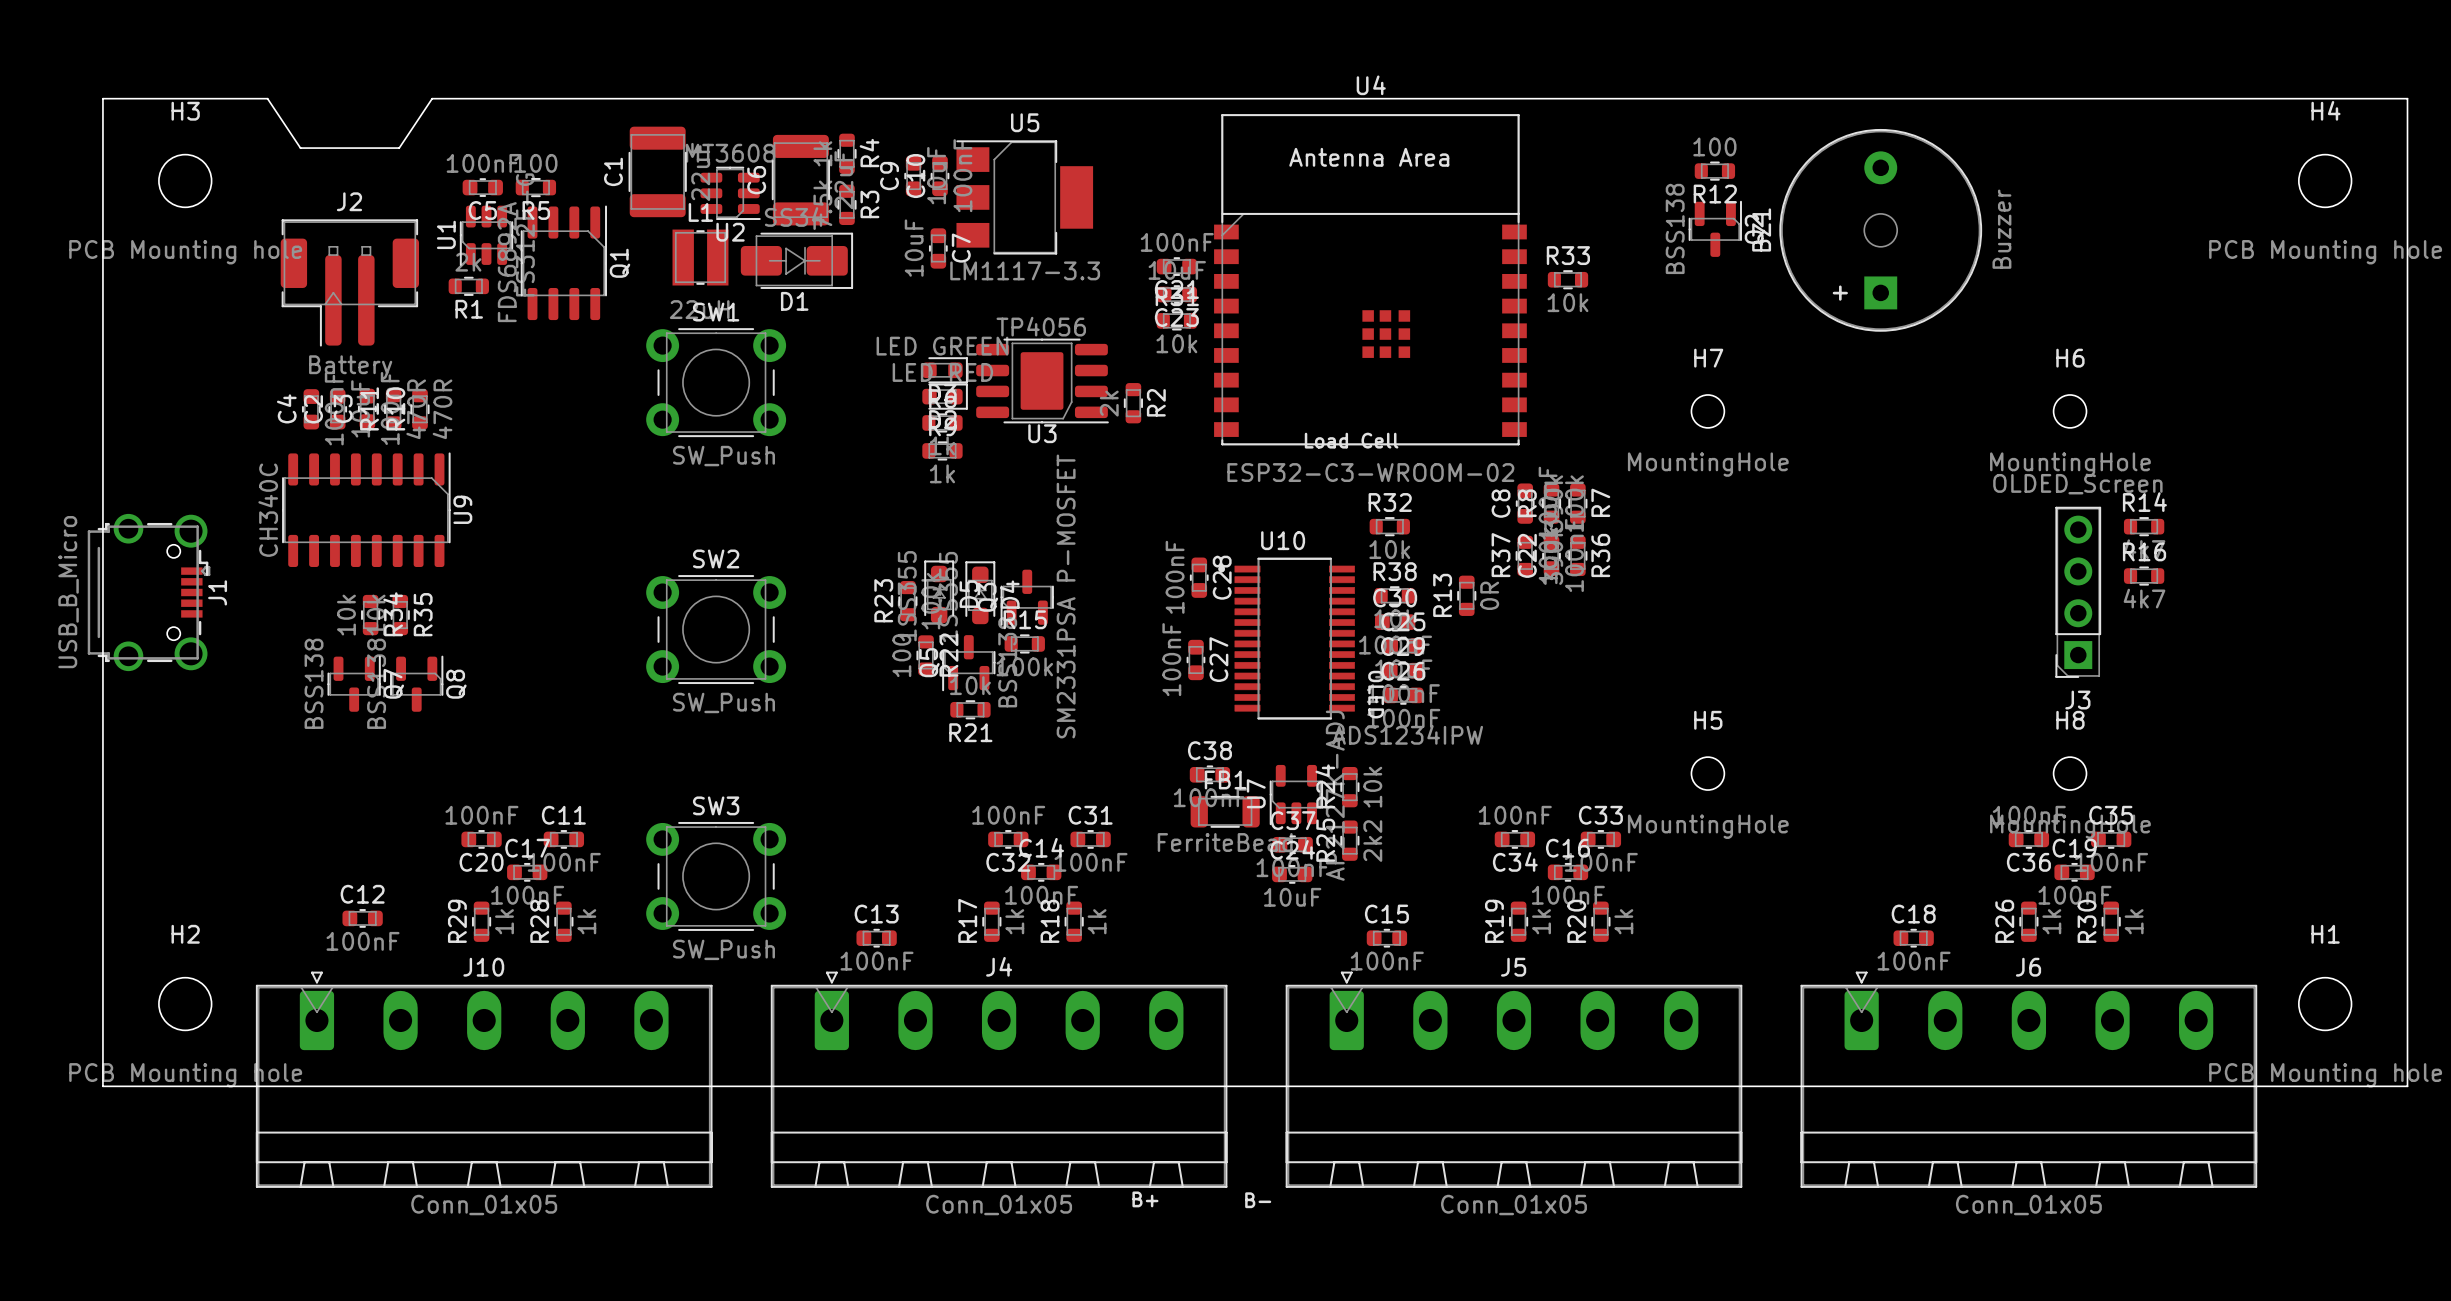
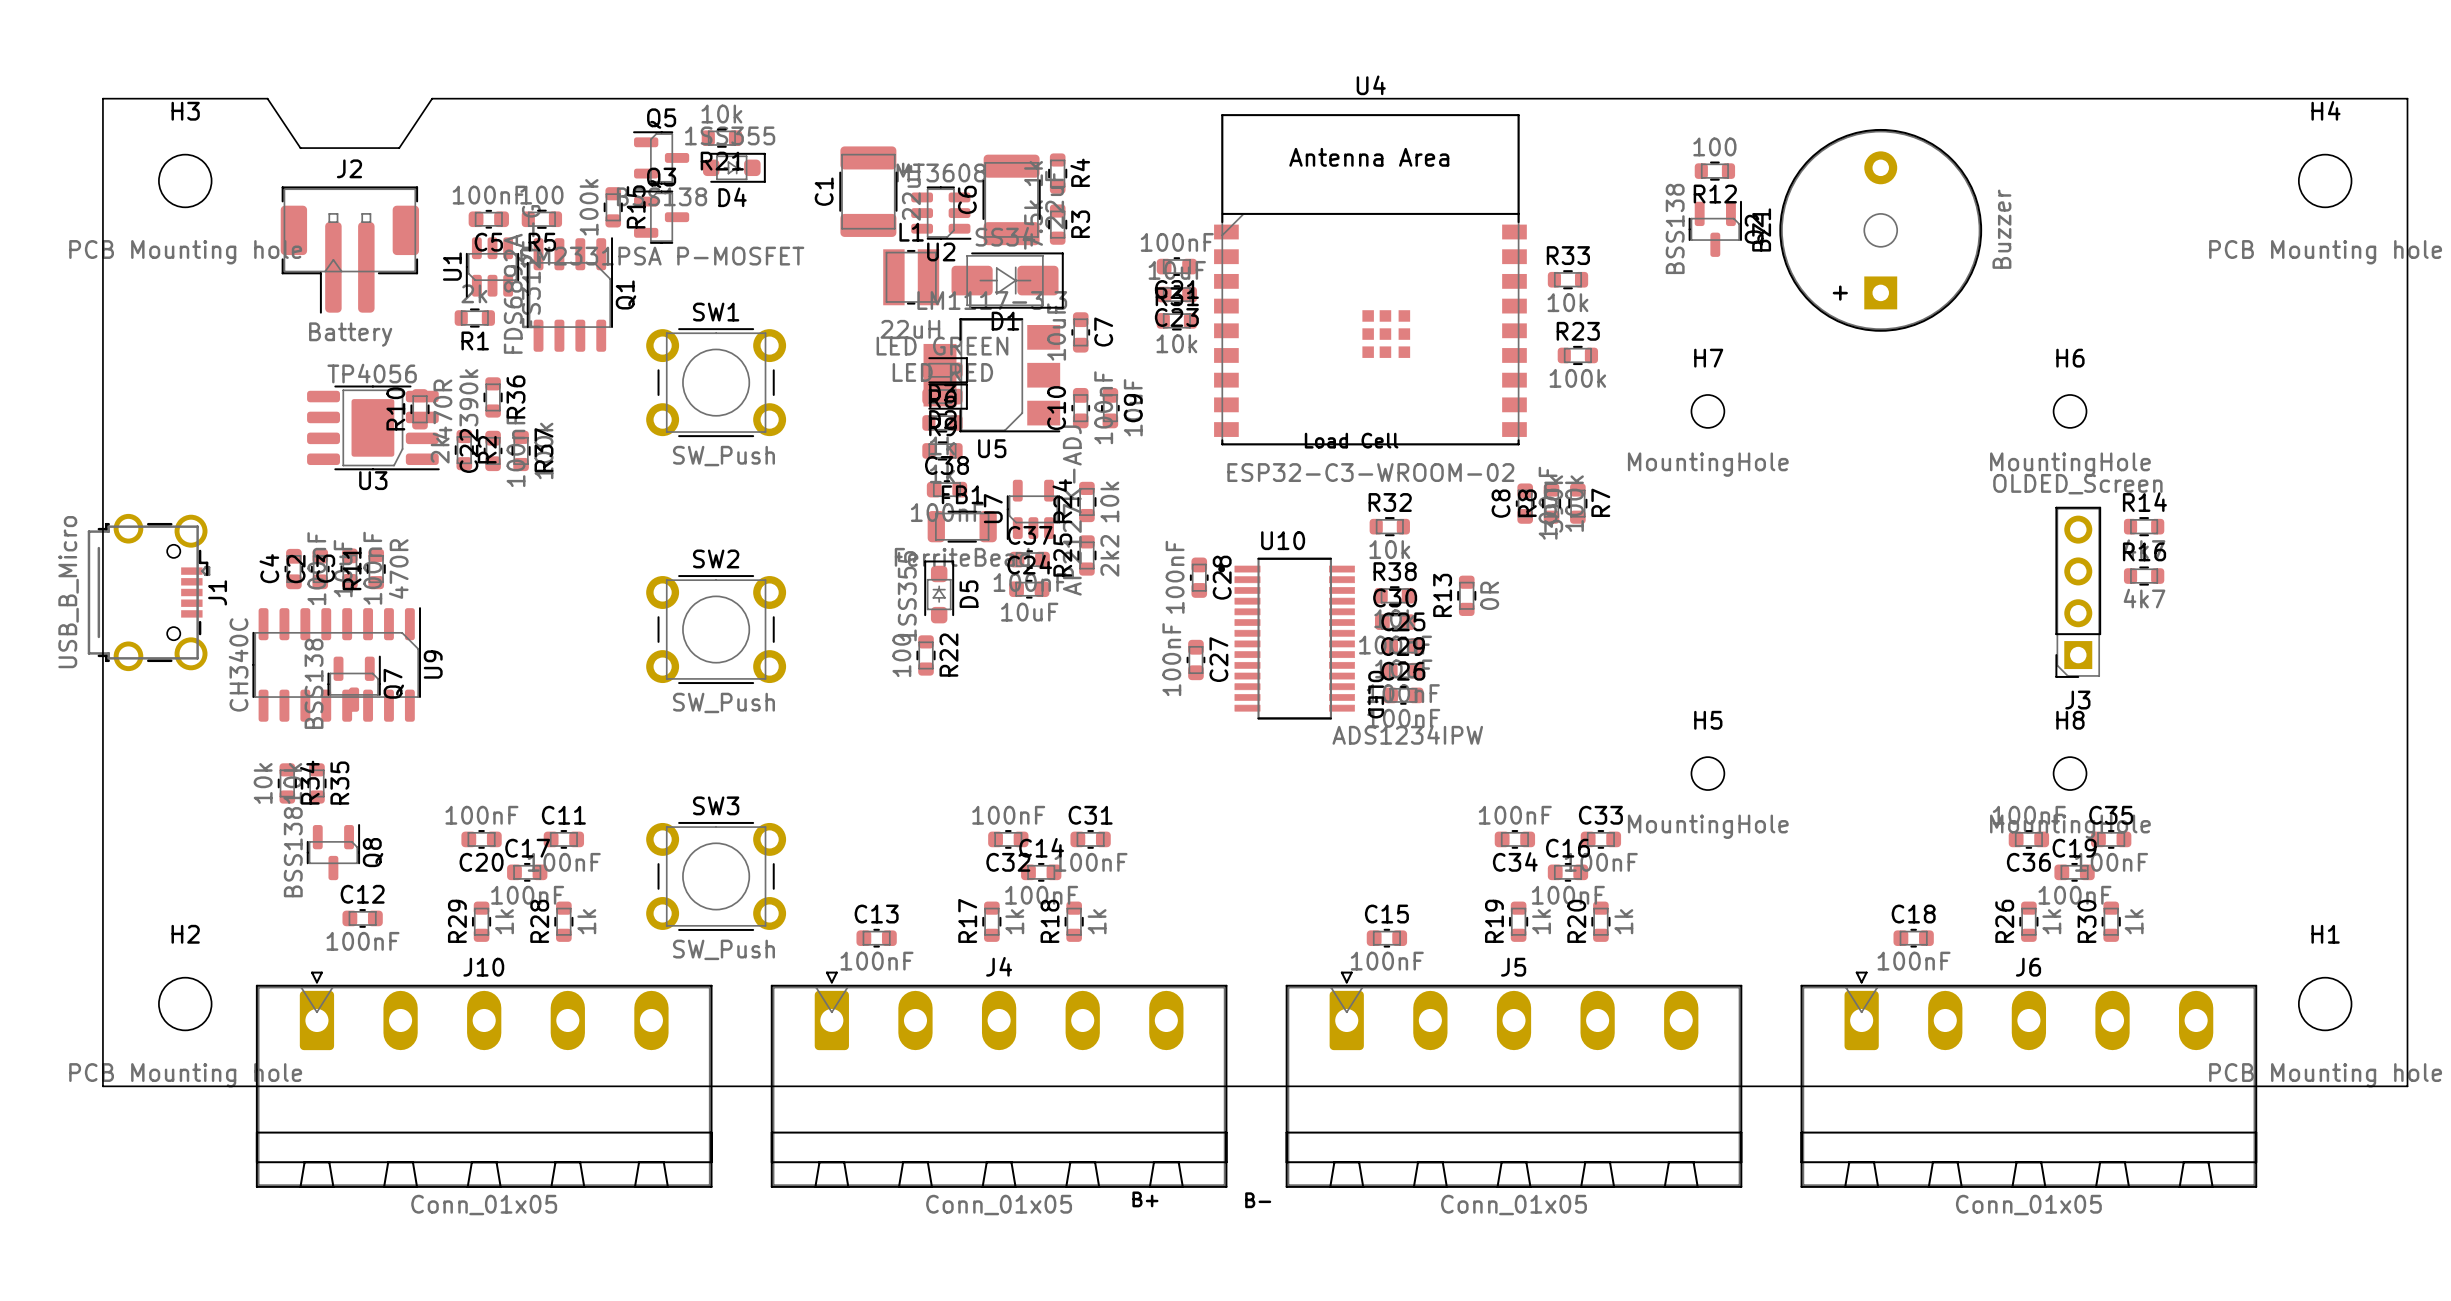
R4 position: (846, 153) -> (1057, 173)
C1 position: (657, 171) -> (868, 191)
C9 name position: C9 (889, 176) -> C9 (1133, 408)
C9 position: (913, 176) -> (1110, 408)
C10 position: (940, 176) -> (1080, 408)
C6 position: (800, 180) -> (1011, 199)
C5 position: (482, 187) -> (488, 219)
R5 position: (535, 187) -> (541, 219)
U2 position: (730, 193) -> (941, 213)
U5 rotation: 0° (1024, 197) -> 180° (991, 375)
U5 position: (1024, 197) -> (991, 375)
R3 position: (846, 204) -> (1057, 224)
U1 position: (486, 235) -> (492, 267)
C7 position: (938, 248) -> (1080, 332)
L1 position: (700, 257) -> (911, 277)
D1 position: (796, 260) -> (1007, 280)
Q1 position: (563, 262) -> (569, 294)
J2 position: (349, 282) -> (349, 250)
R1 position: (468, 286) -> (474, 318)
U3 position: (1042, 380) -> (373, 427)
R2 position: (1133, 403) -> (464, 450)
C3 position: (367, 408) -> (349, 568)
C4 position: (311, 409) -> (293, 569)
C2 position: (337, 409) -> (320, 569)
R11 position: (393, 409) -> (376, 569)
U9 position: (366, 509) -> (336, 664)
R37 name position: R37 (1501, 555) -> R37 (543, 450)
R37 position: (1525, 555) -> (521, 450)
C22 position: (1551, 555) -> (493, 450)
R36 position: (1577, 555) -> (493, 397)
D4 rotation: 0° (980, 592) -> 90° clockwise (734, 167)
D4 position: (980, 592) -> (734, 167)
Q3 rotation: 0° (1027, 597) -> 90° clockwise (661, 217)
Q3 position: (1027, 597) -> (661, 217)
R23 rotation: 0° (907, 601) -> 90° clockwise (1577, 355)
R23 position: (907, 601) -> (1577, 355)
R34 position: (370, 615) -> (287, 783)
R35 position: (400, 615) -> (316, 783)
R15 rotation: 0° (1024, 643) -> 90° clockwise (613, 207)
R15 position: (1024, 643) -> (613, 207)
Q5 rotation: 0° (968, 663) -> 90° clockwise (661, 157)
Q5 position: (968, 663) -> (661, 157)
Q8 position: (416, 683) -> (333, 852)
R21 position: (970, 709) -> (721, 138)
C38 position: (1209, 774) -> (946, 489)
R24 position: (1349, 787) -> (1086, 501)
U7 position: (1296, 795) -> (1033, 509)
FB1 position: (1225, 811) -> (962, 526)
R25 position: (1349, 840) -> (1086, 555)
C37 position: (1292, 844) -> (1029, 559)
C24 position: (1292, 874) -> (1029, 589)

